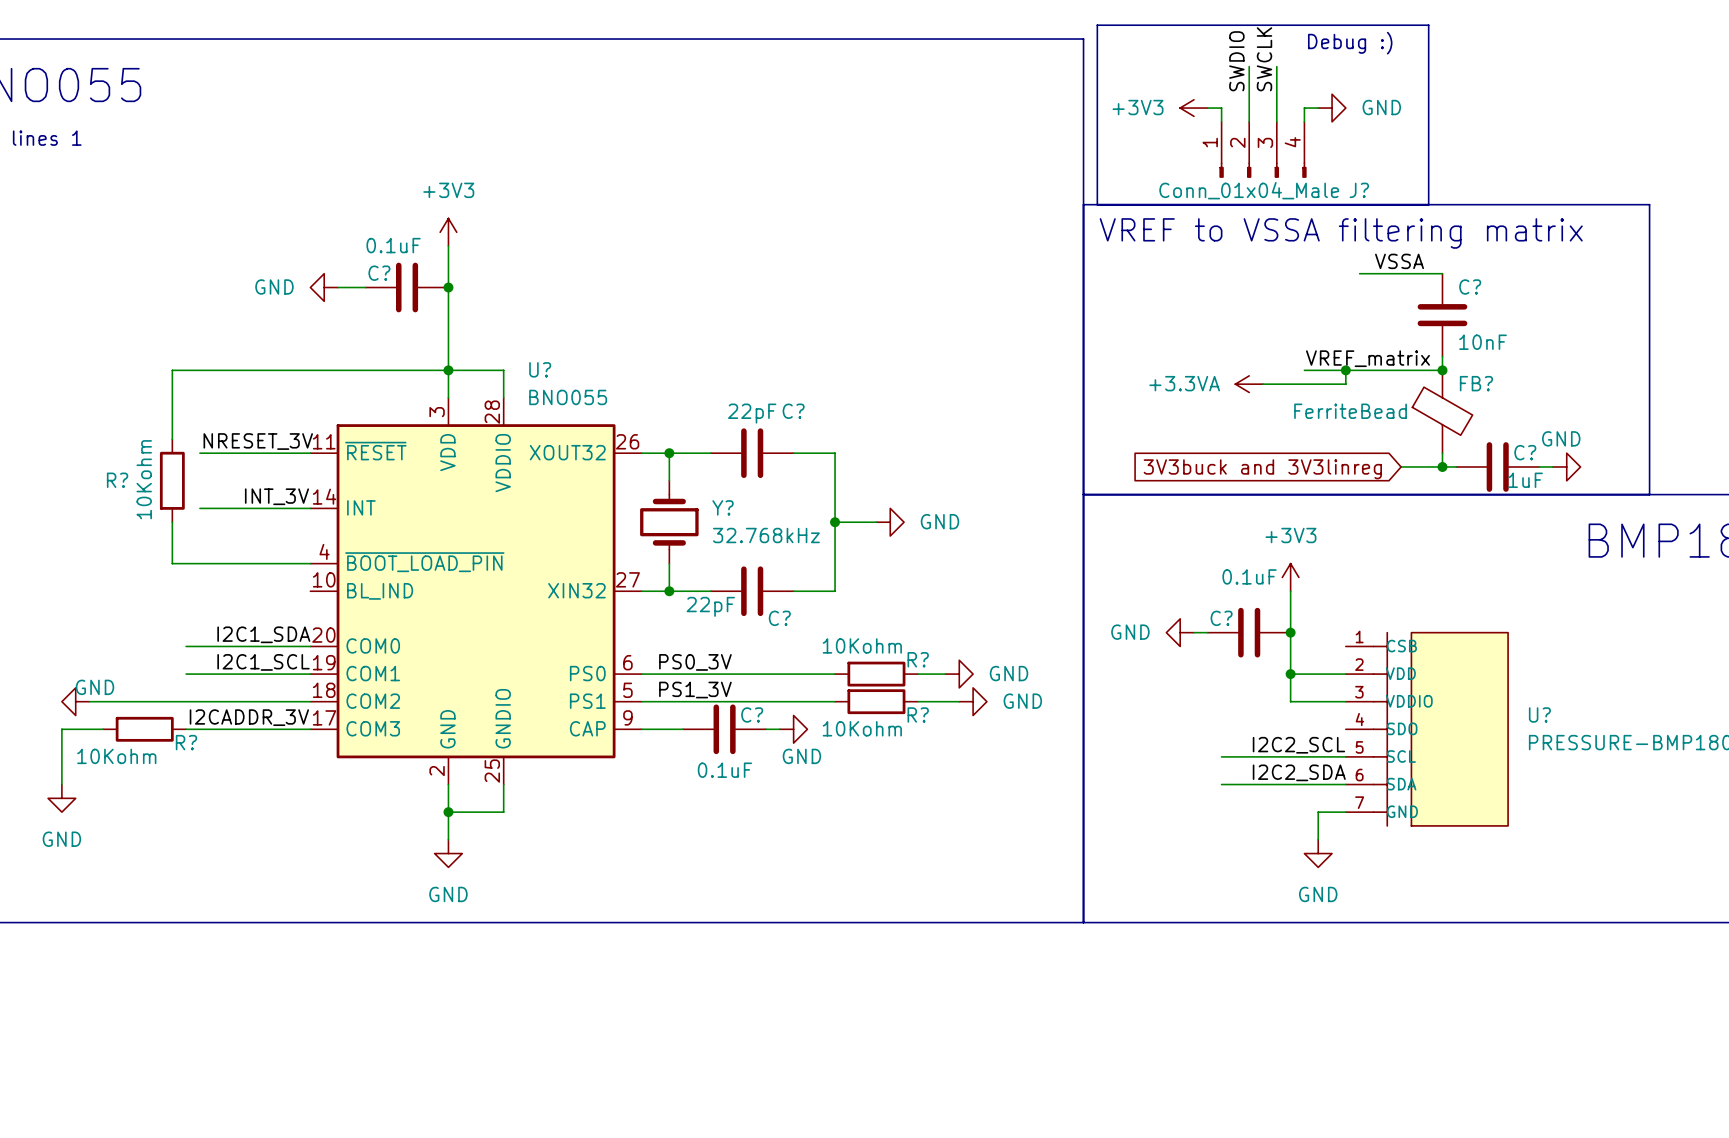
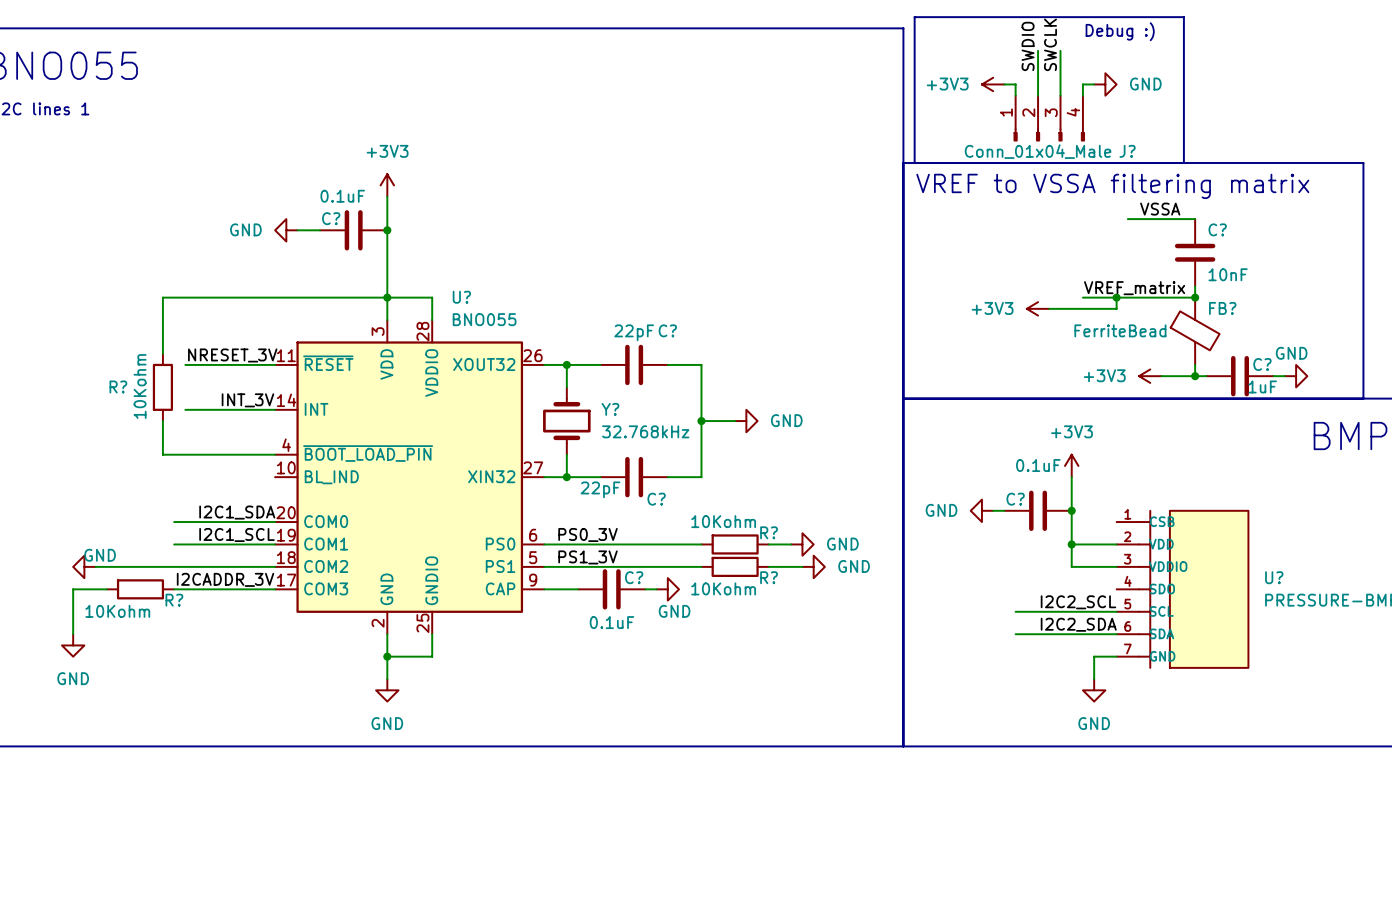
power symbol: +3.3VA (1249, 384) -> +3V3 (1038, 308)
power symbol: none -> +3V3 (1150, 376)
global label: 3V3buck and 3V3linreg (1262, 469) -> none

